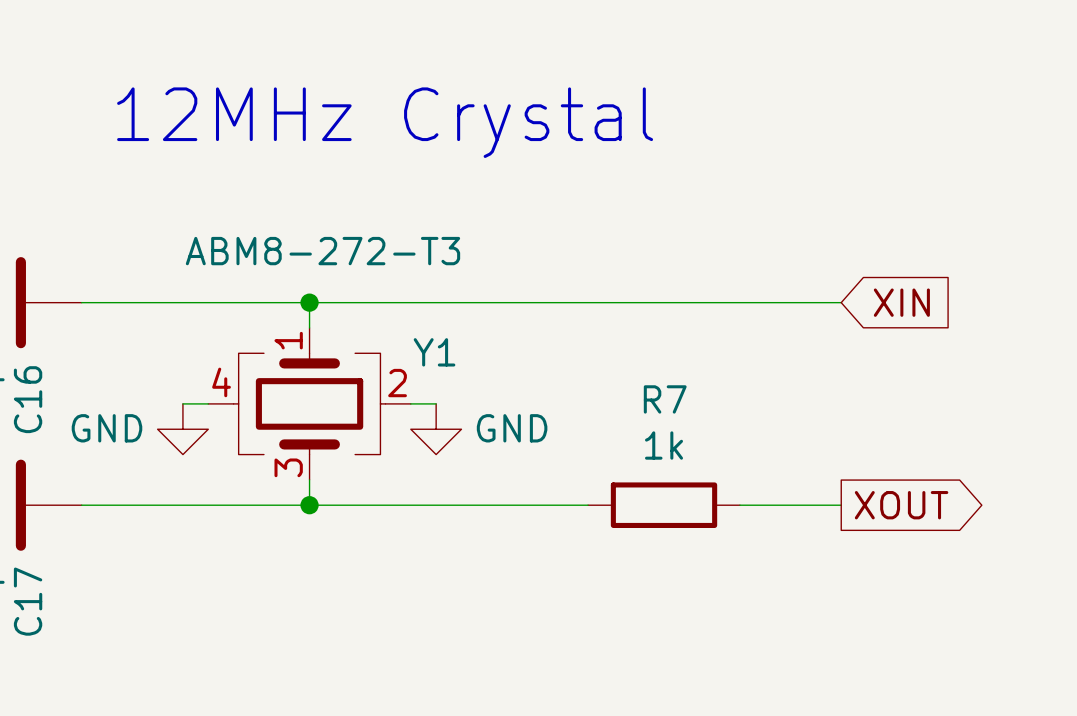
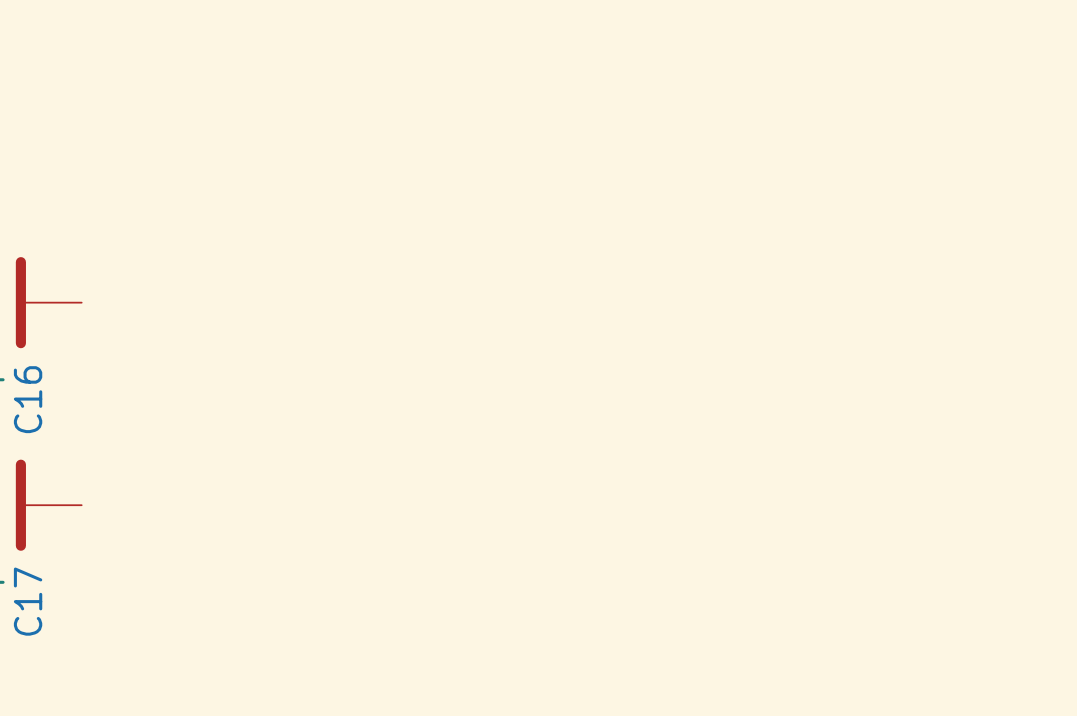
text: 12MHz Crystal (385, 122) -> none
wire: (81, 302) (841, 302) -> none
wire: (309, 302) (309, 327) -> none
junction: (309, 302) -> none
global label: XIN (901, 302) -> none
wire: (182, 403) (208, 403) -> none
Y1: ABM8-272-T3 (309, 403) -> none
wire: (410, 403) (436, 403) -> none
power symbol: GND (182, 429) -> none
power symbol: GND (436, 429) -> none
wire: (309, 479) (309, 505) -> none
wire: (81, 505) (588, 505) -> none
junction: (309, 505) -> none
R7: 1k (664, 505) -> none
wire: (739, 505) (841, 505) -> none
global label: XOUT (901, 505) -> none

